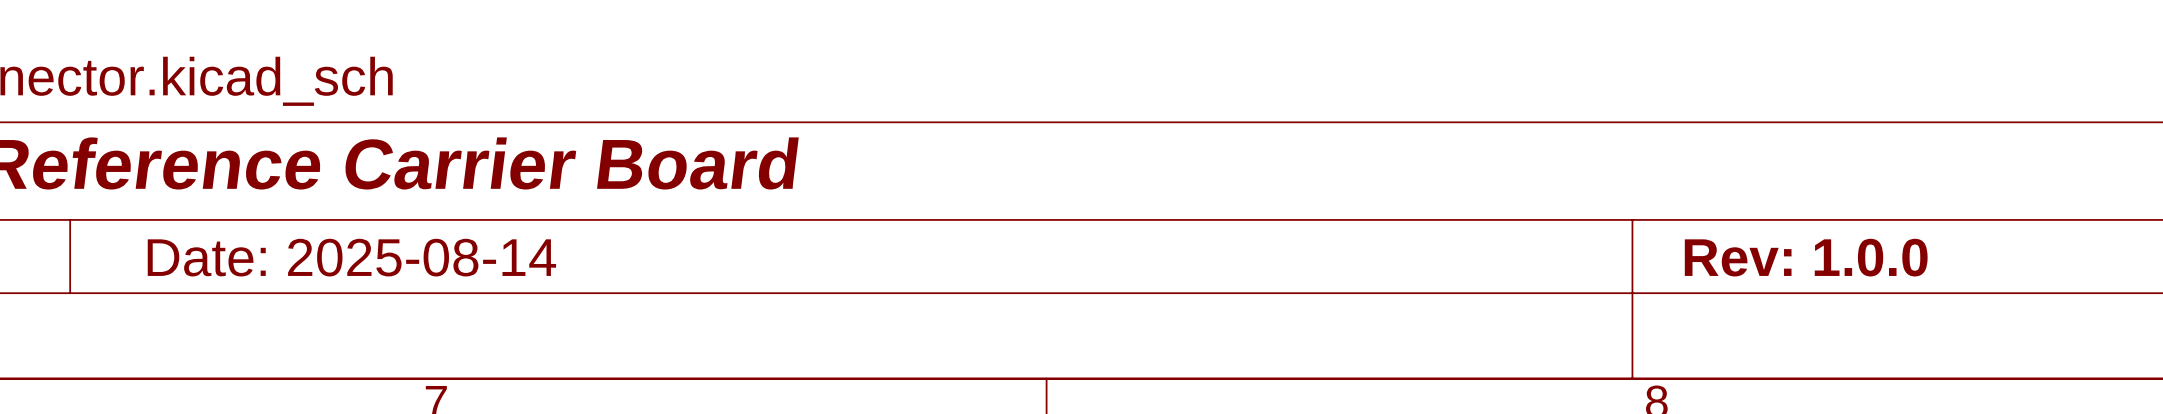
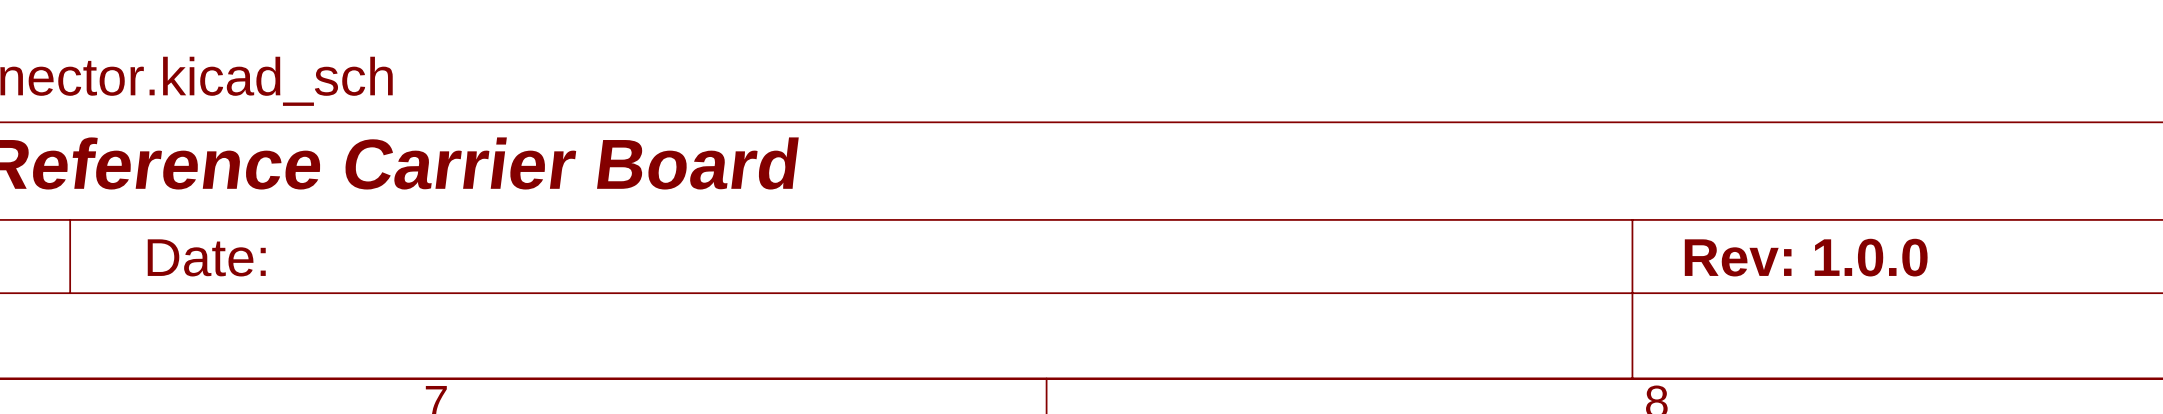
title block: Date: 2025-08-14 (351, 257) -> Date: (206, 257)

